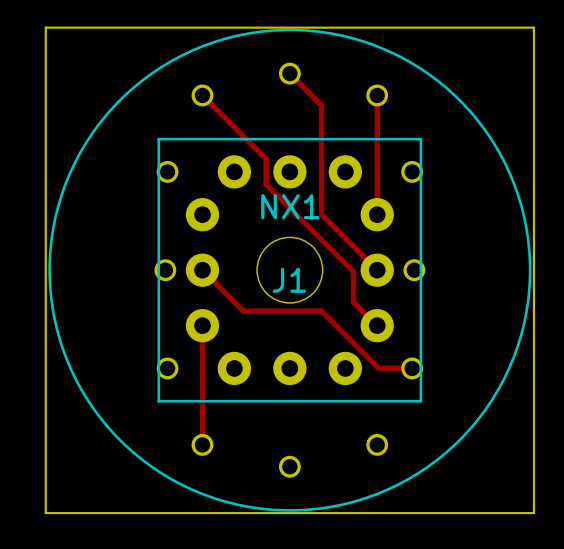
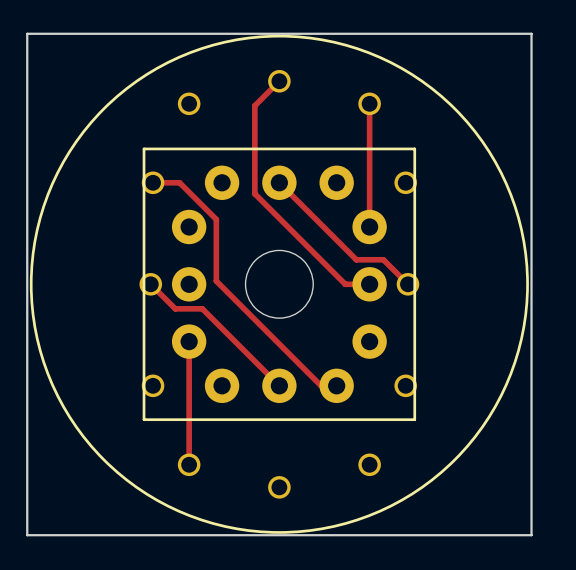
track: (289, 73) (321, 105) (321, 214) (377, 270) -> none
track: (202, 95) (266, 159) -> (279, 81) (254, 105) (254, 169)
track: none -> (153, 182) (179, 182) (216, 219) (216, 281) (321, 385) (336, 385)
track: none -> (279, 182) (356, 259) (383, 259) (407, 284)
track: (266, 182) (353, 271) (353, 301) (377, 325) -> (254, 193) (345, 284) (369, 284)
NX1 name: NX1 (290, 206) -> none
track: none -> (150, 284) (175, 308) (202, 308) (279, 385)
track: (202, 270) (243, 311) (321, 311) (378, 368) (412, 368) -> none
J1 name: J1 (289, 280) -> none

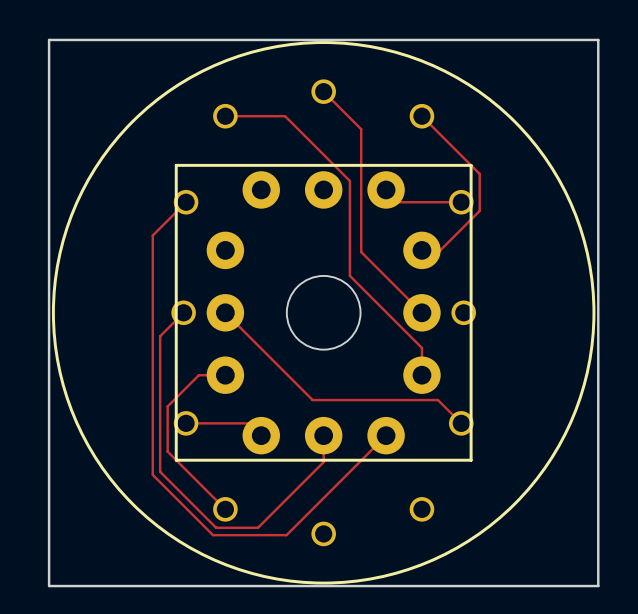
track: (279, 81) (254, 105) (254, 193) (345, 284) (369, 284) -> (323, 91) (361, 129) (361, 252) (421, 312)
track: none -> (225, 116) (285, 116) (349, 180) (349, 275) (421, 347) (421, 375)
track: (369, 103) (369, 227) -> (421, 116) (479, 173) (479, 210) (440, 250) (421, 250)
part footprint: [142, 147, 417, 422] -> [174, 163, 473, 462]
track: none -> (386, 189) (398, 202) (461, 202)
track: (153, 182) (179, 182) (216, 219) (216, 281) (321, 385) (336, 385) -> (186, 202) (152, 235) (152, 474) (213, 535) (286, 535) (386, 435)
track: (279, 182) (356, 259) (383, 259) (407, 284) -> none
track: (150, 284) (175, 308) (202, 308) (279, 385) -> (183, 312) (160, 336) (160, 471) (216, 527) (258, 527) (323, 462) (323, 435)
track: none -> (225, 312) (312, 400) (437, 400) (461, 423)
track: (189, 341) (189, 464) -> (225, 375) (198, 375) (167, 406) (167, 451) (225, 509)
track: none -> (186, 423) (248, 423) (261, 435)

